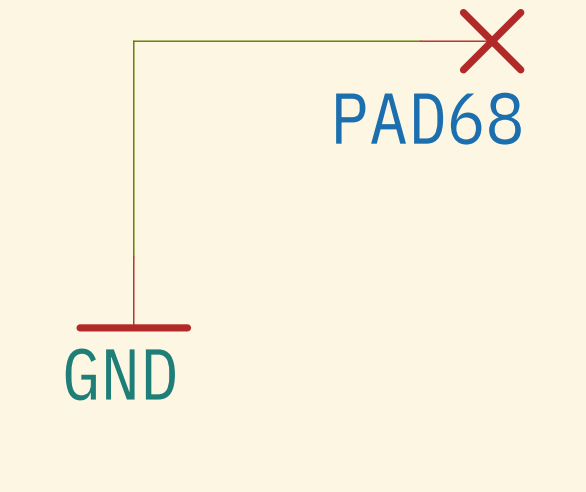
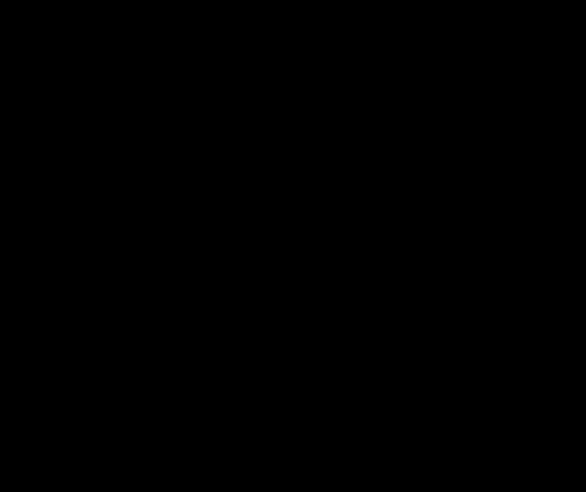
wire: (420, 41) (133, 41) (133, 256) -> none
PAD68: (472, 41) -> none
power symbol: GND (133, 293) -> none

